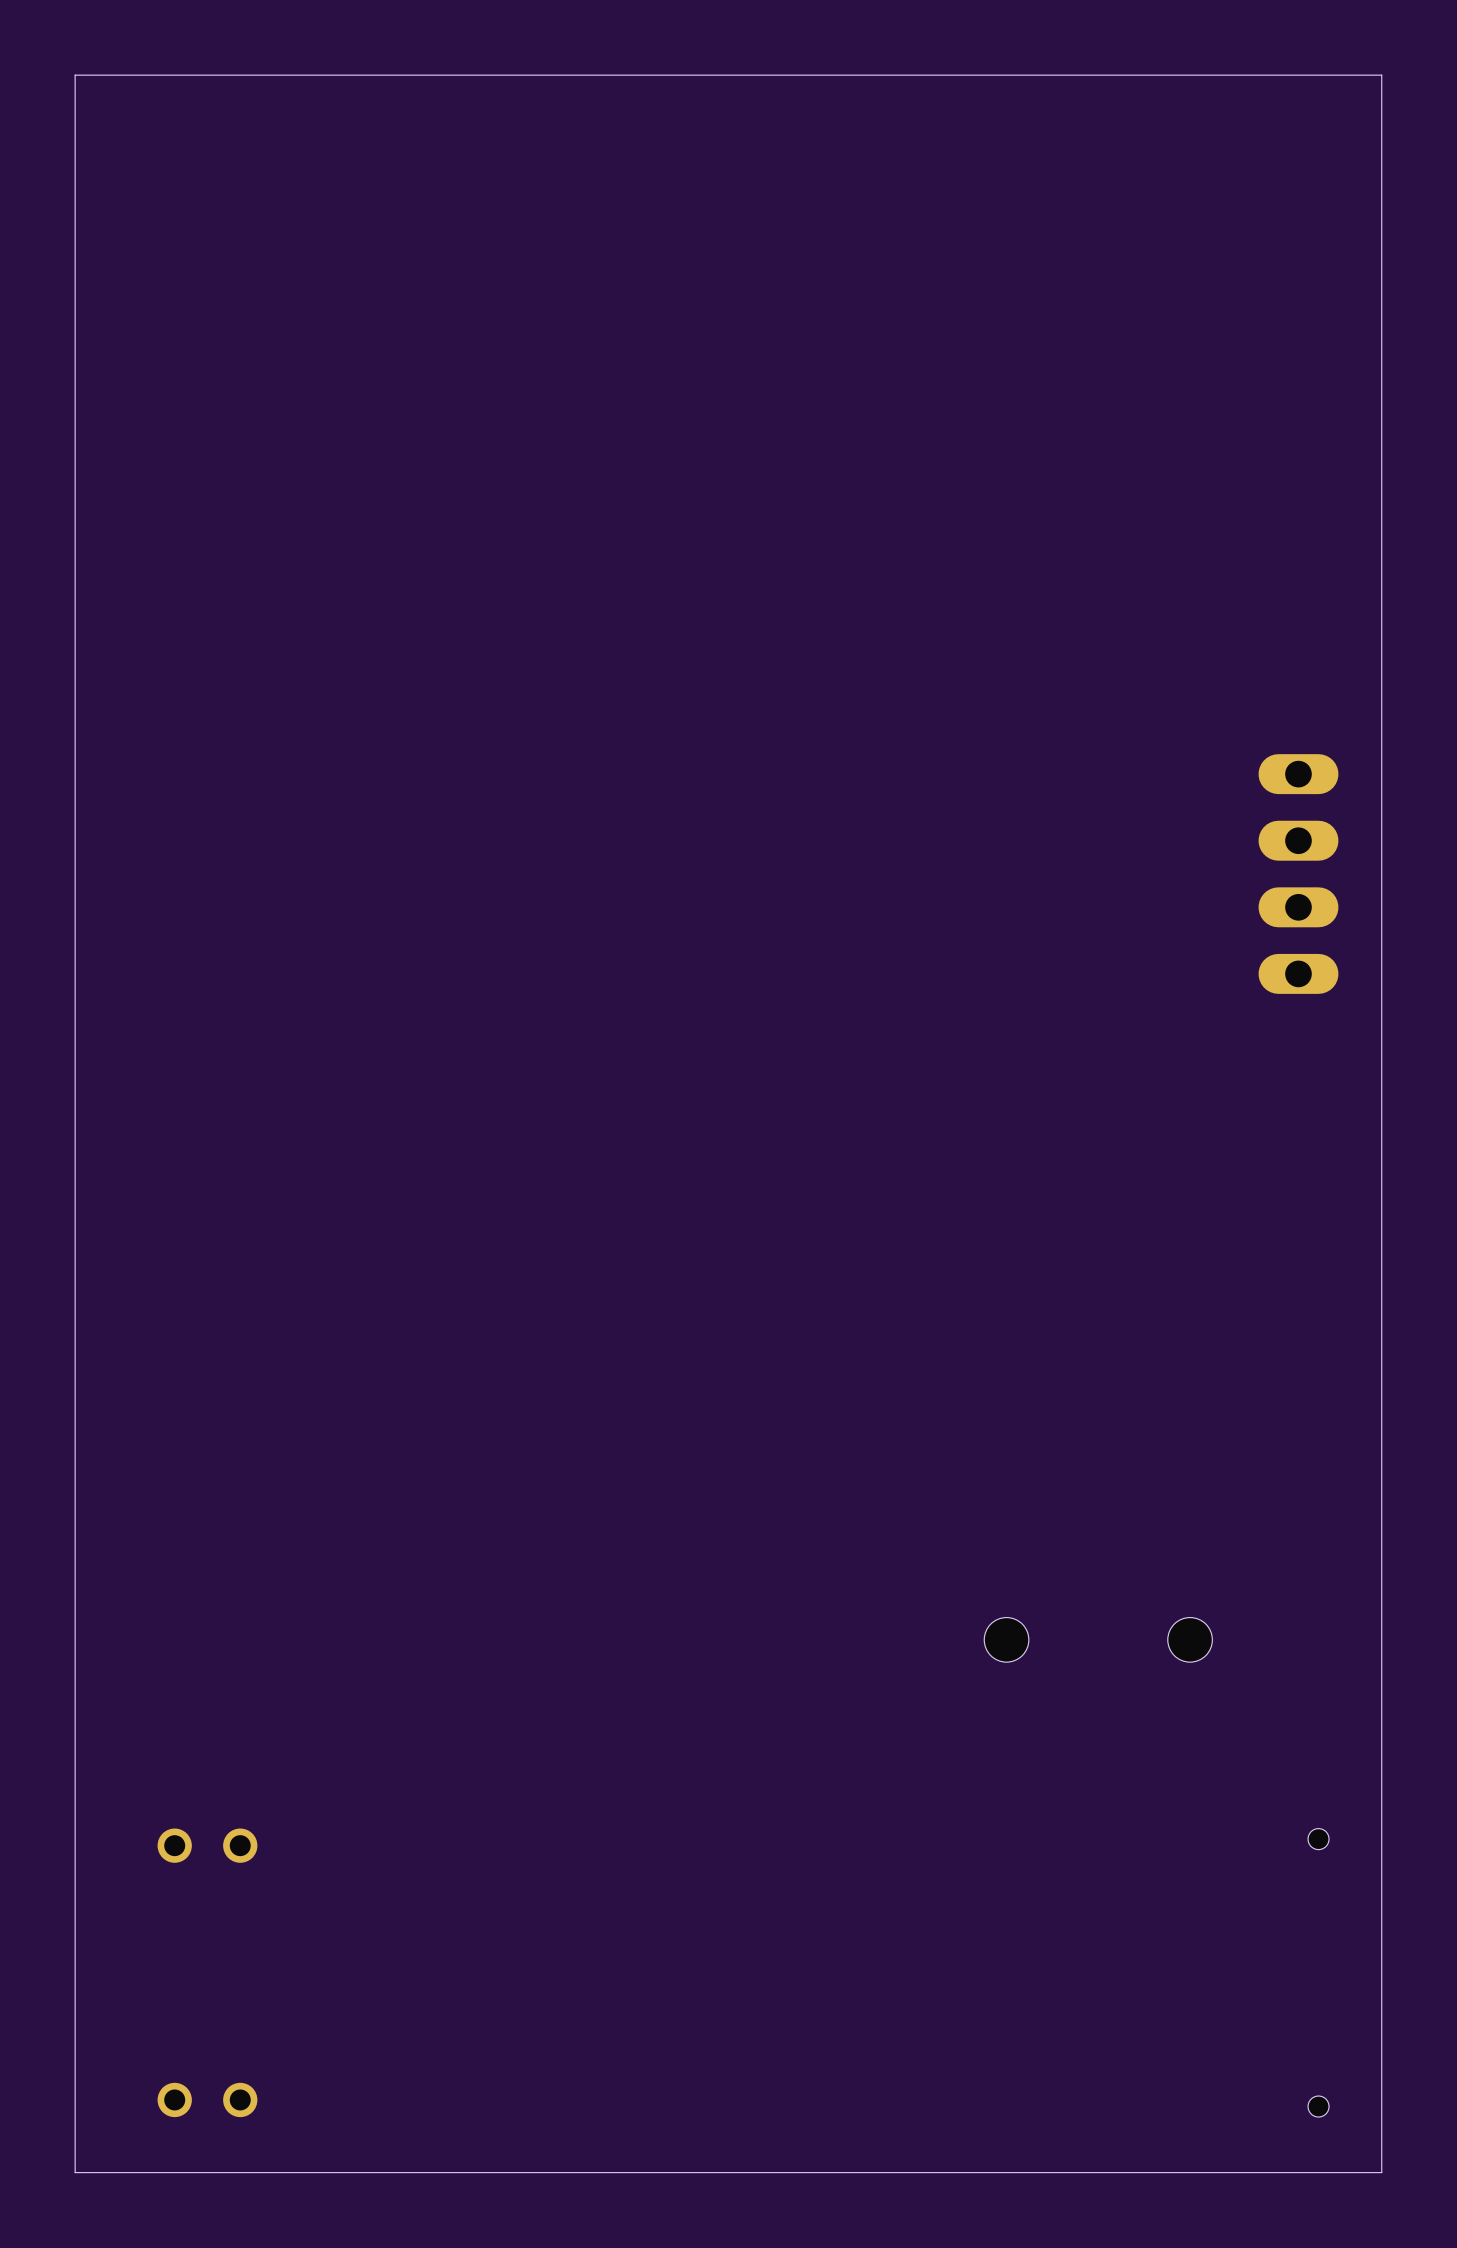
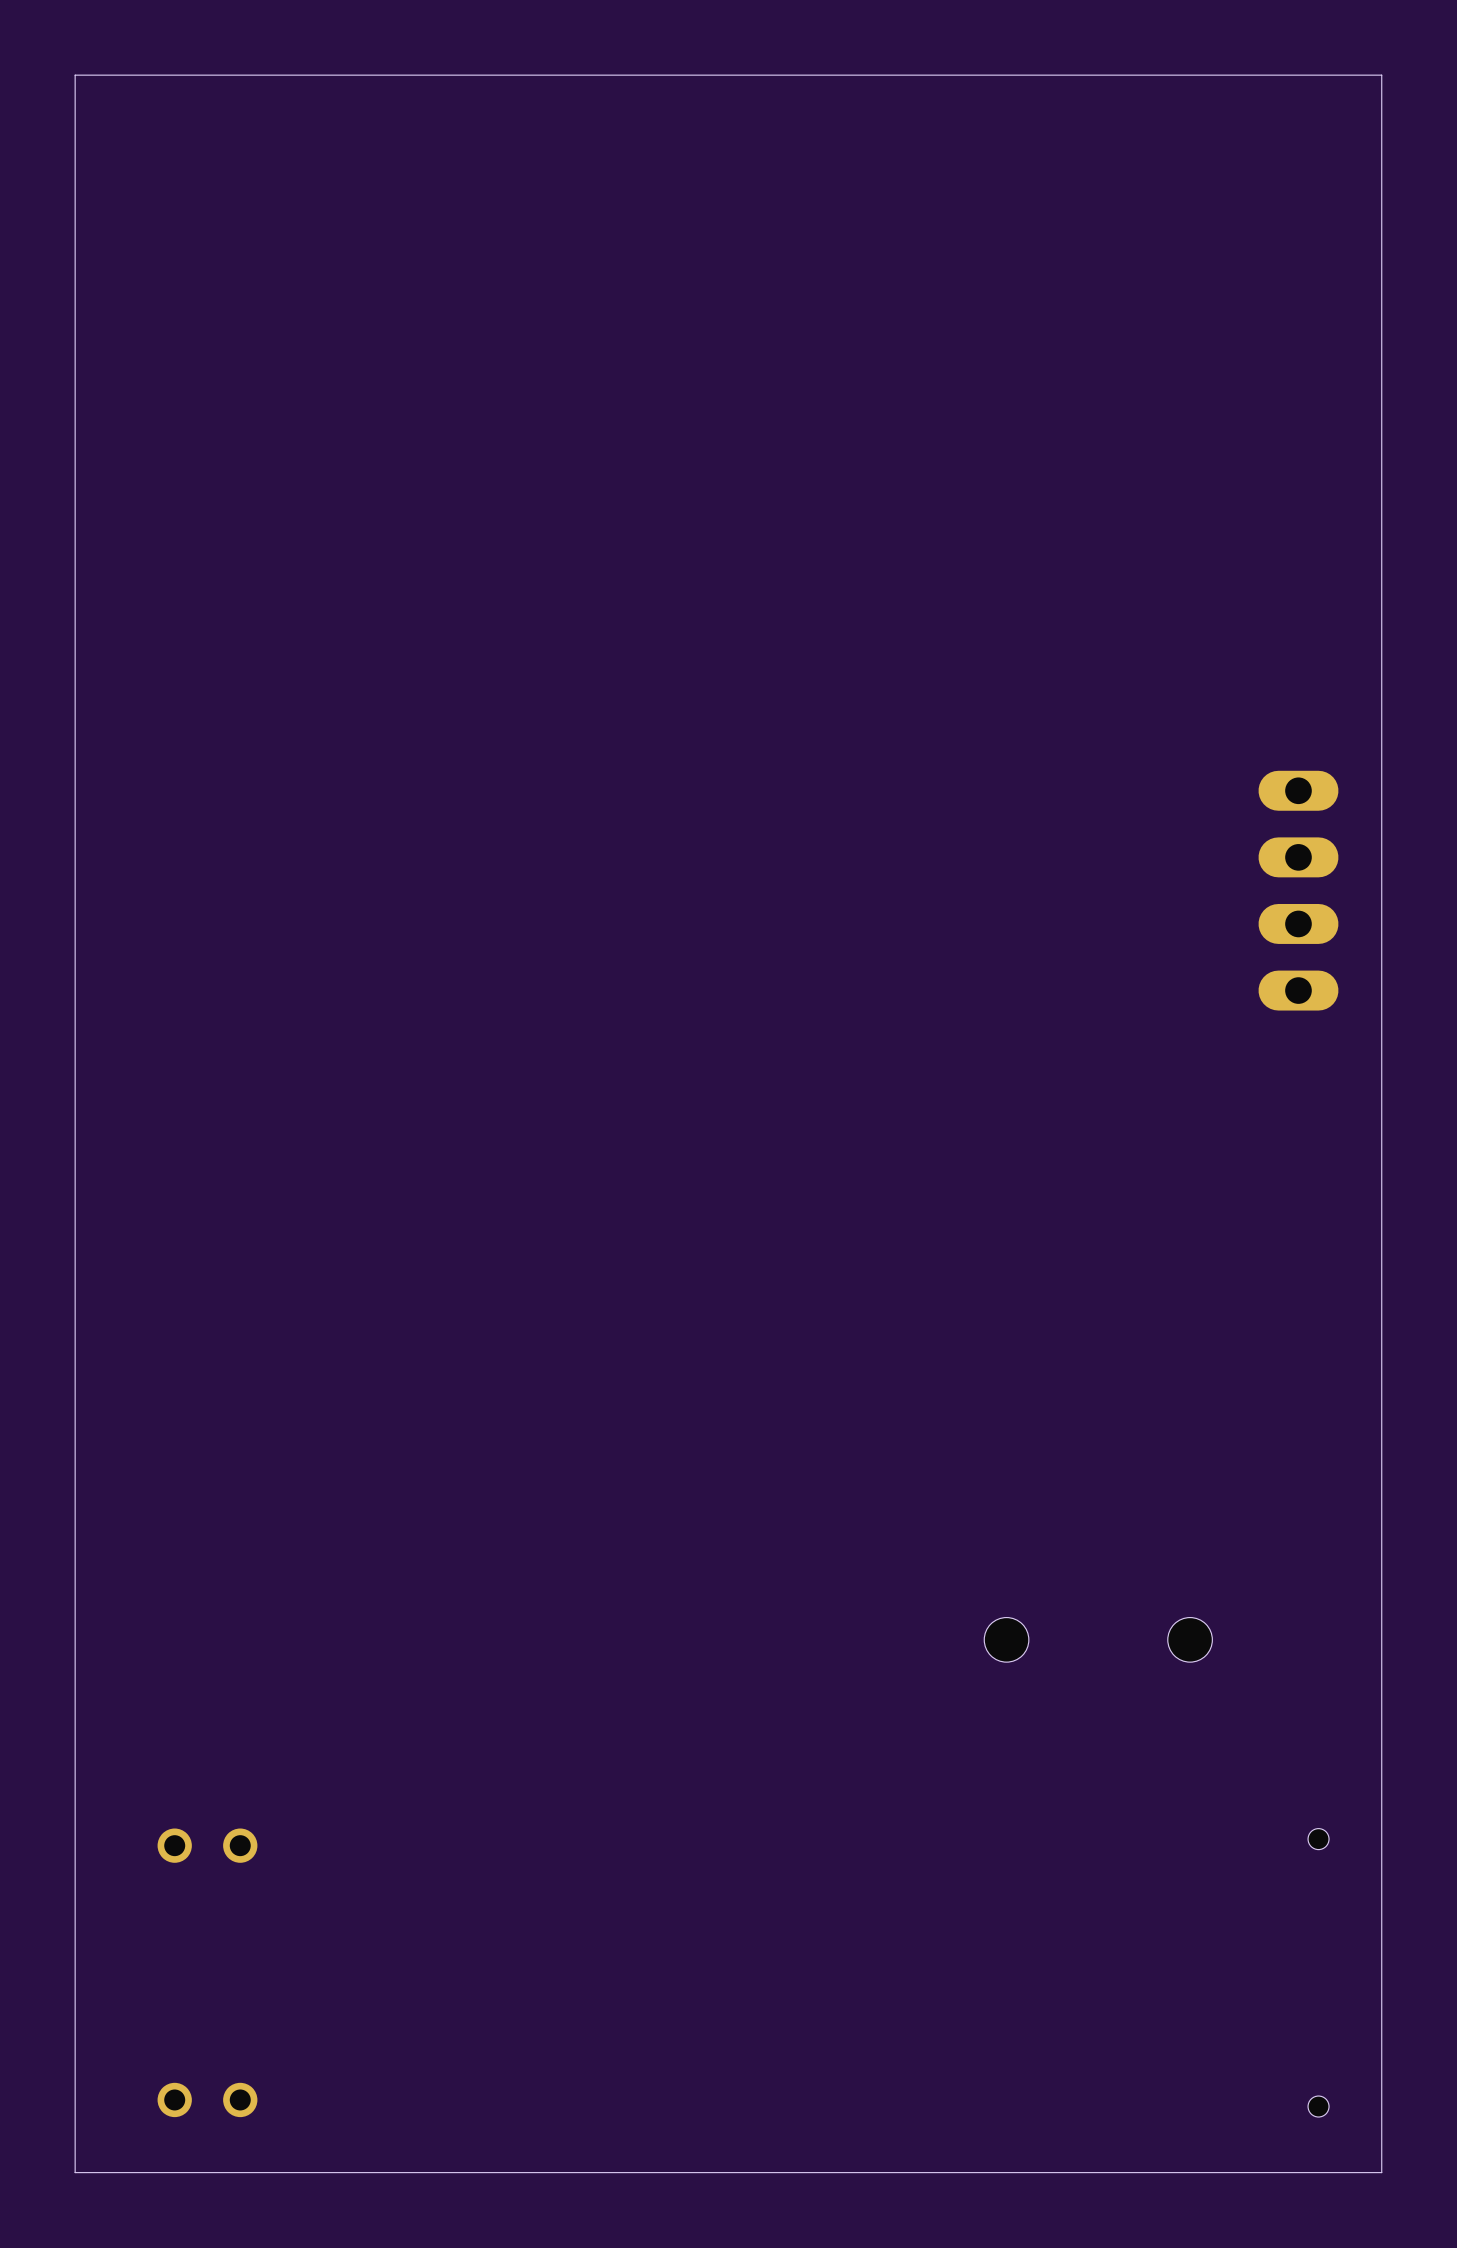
part position: (1298, 874) -> (1298, 890)

